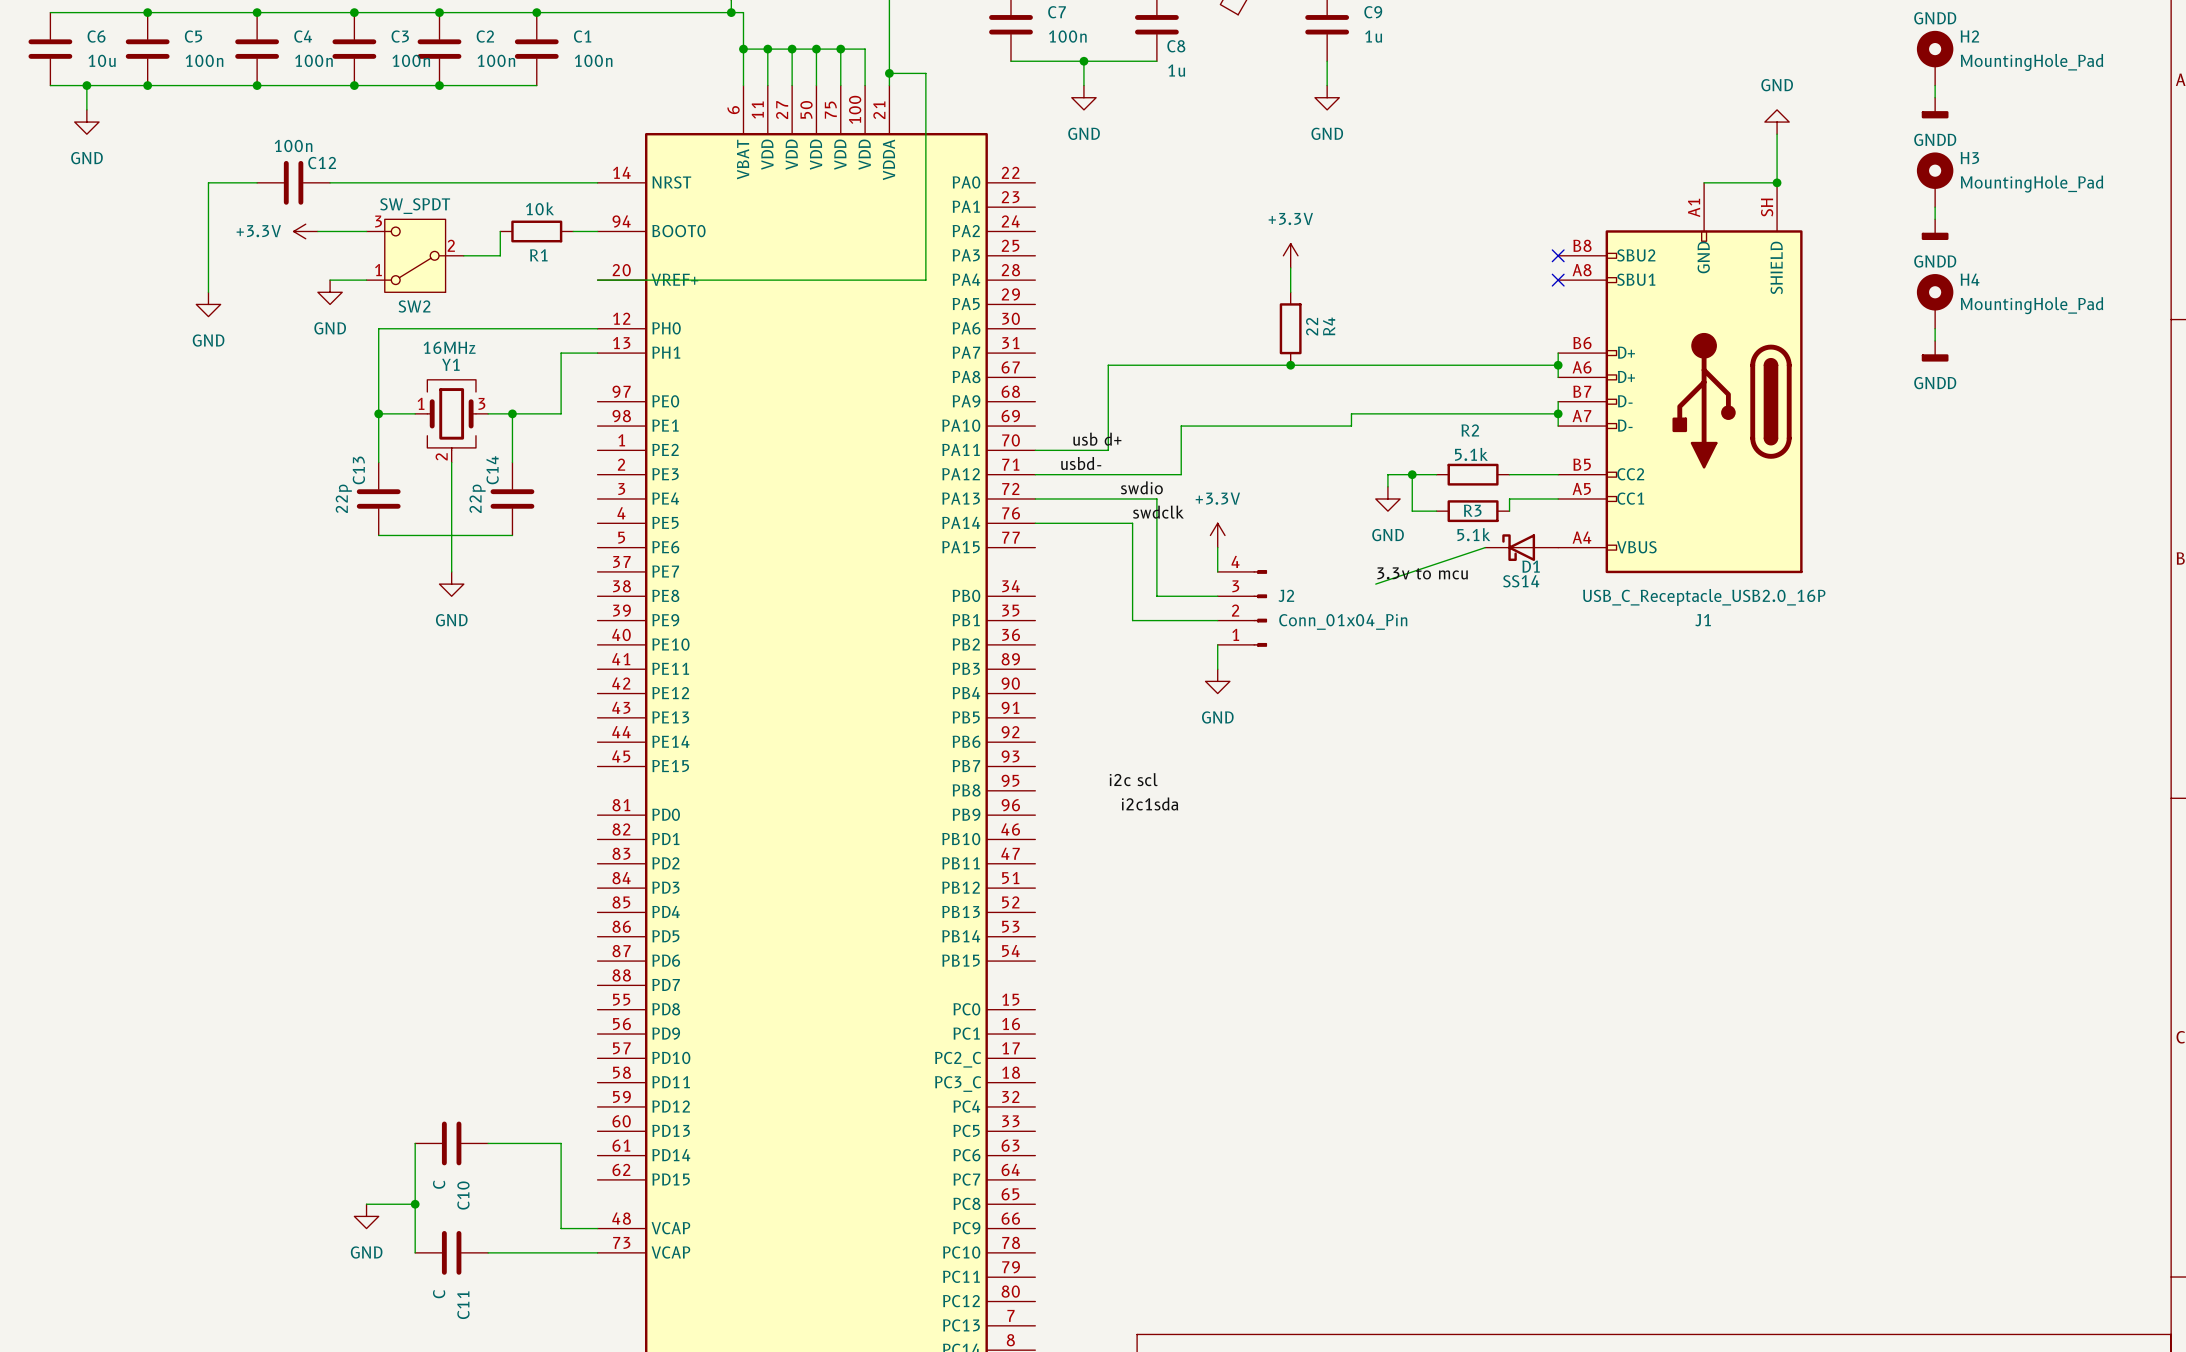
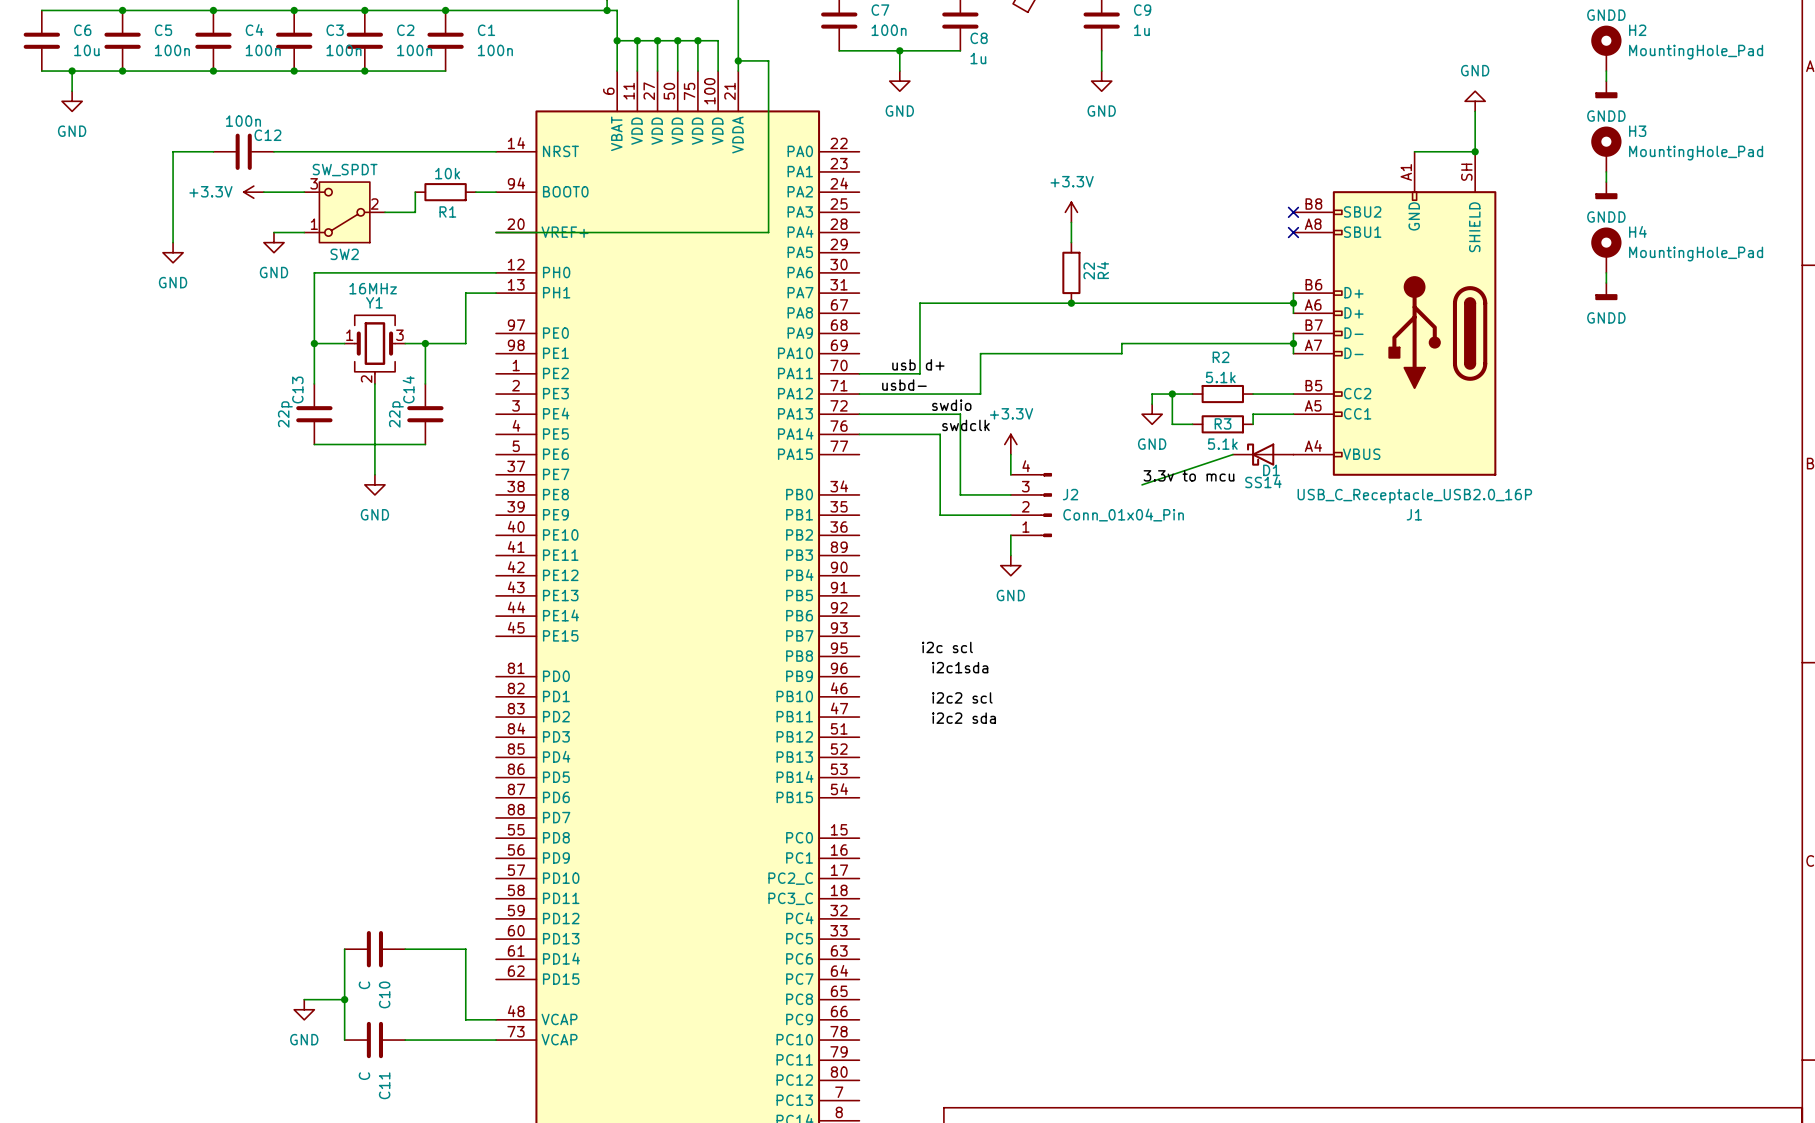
label: none -> i2c2 scl (962, 697)
label: none -> i2c2 sda (964, 718)

